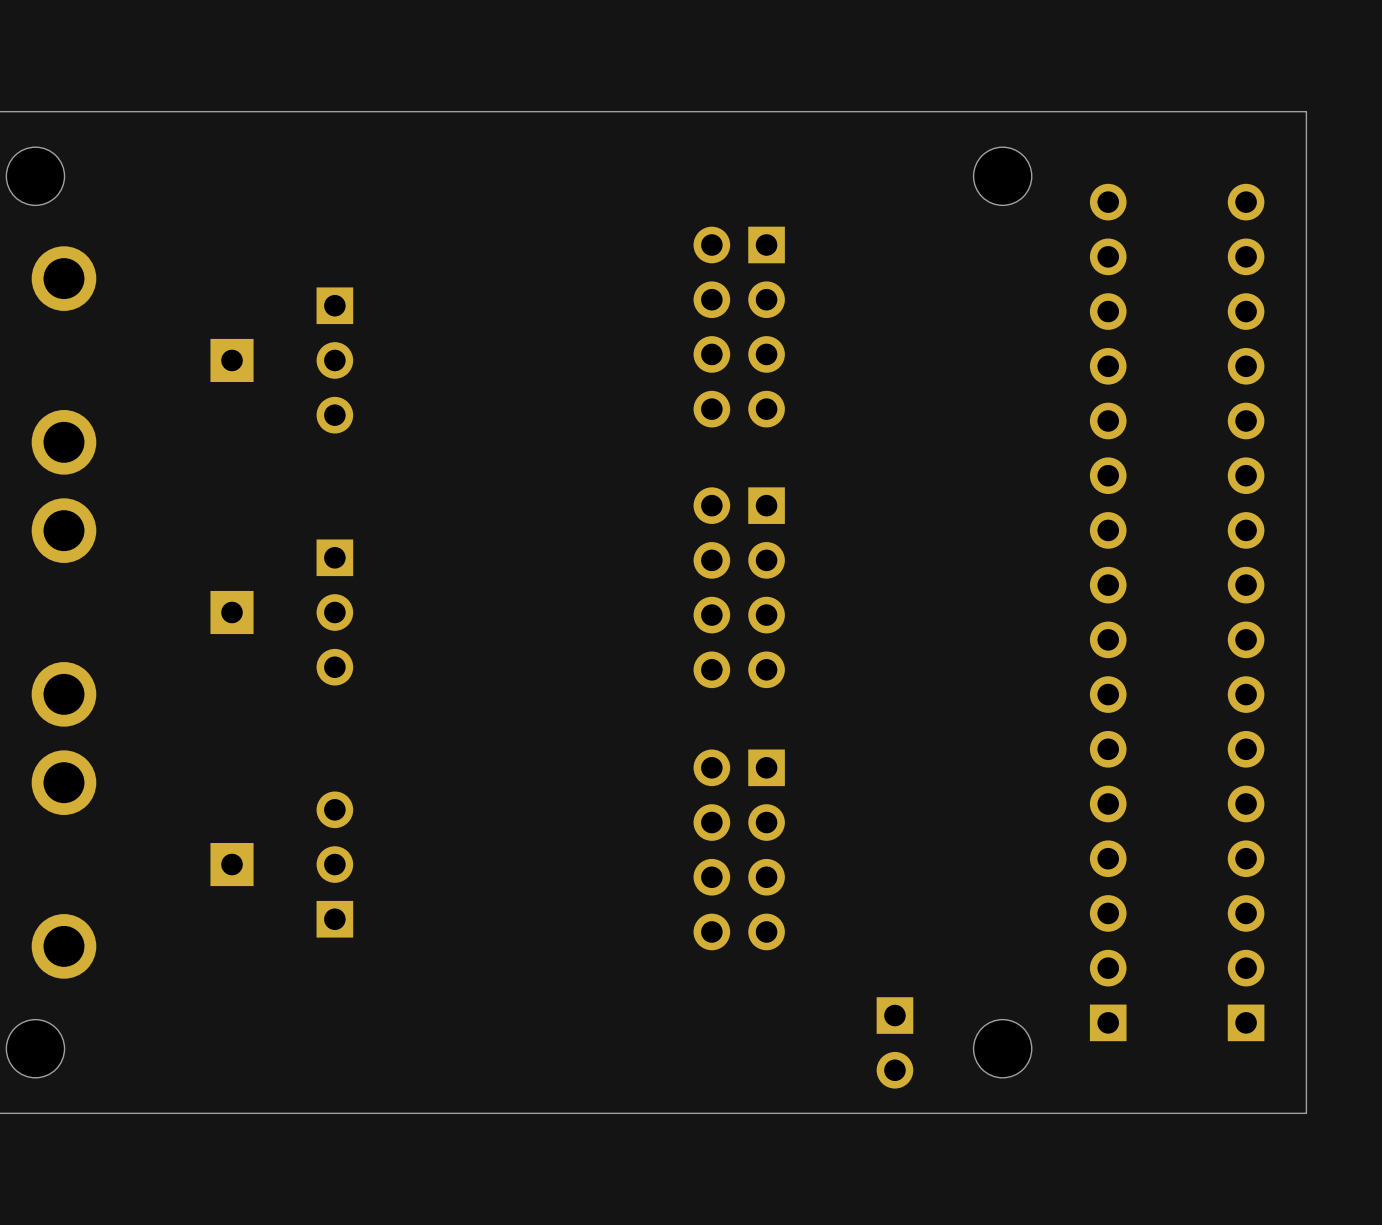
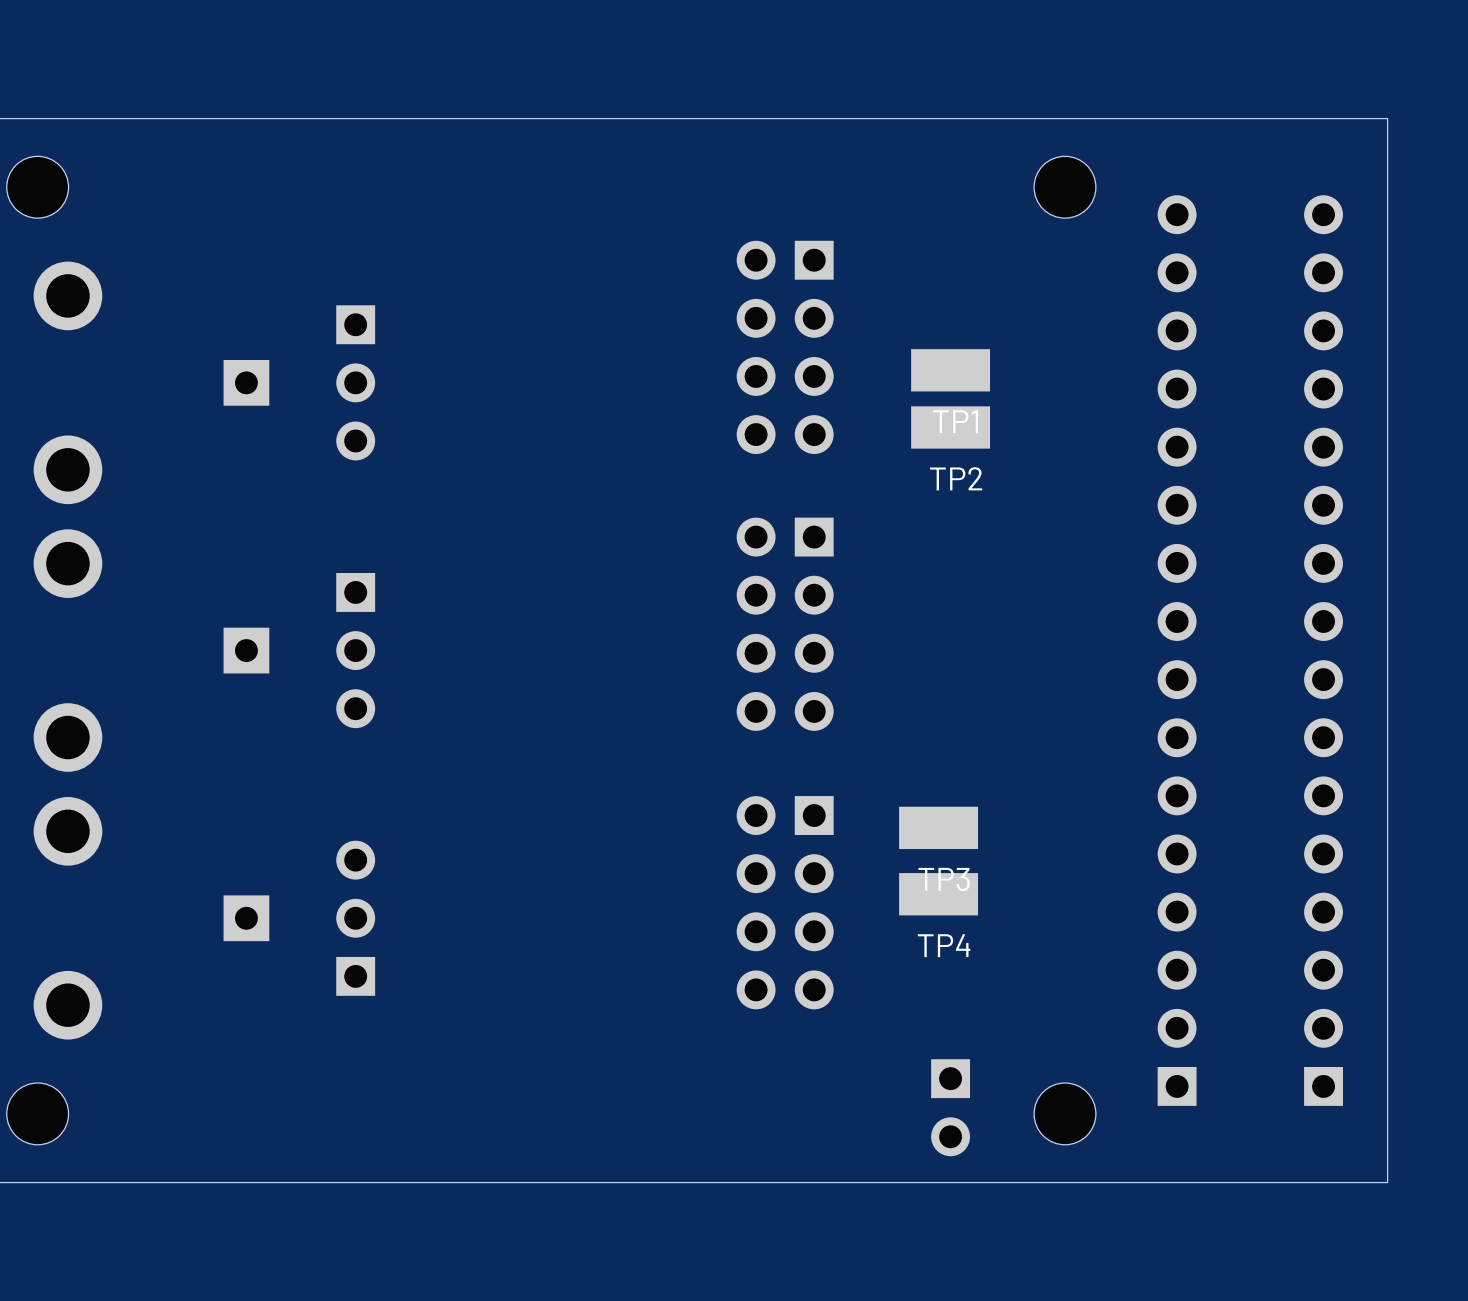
part: none -> (950, 370)
TP2: none -> (950, 427)
part: none -> (938, 827)
TP4: none -> (938, 894)

